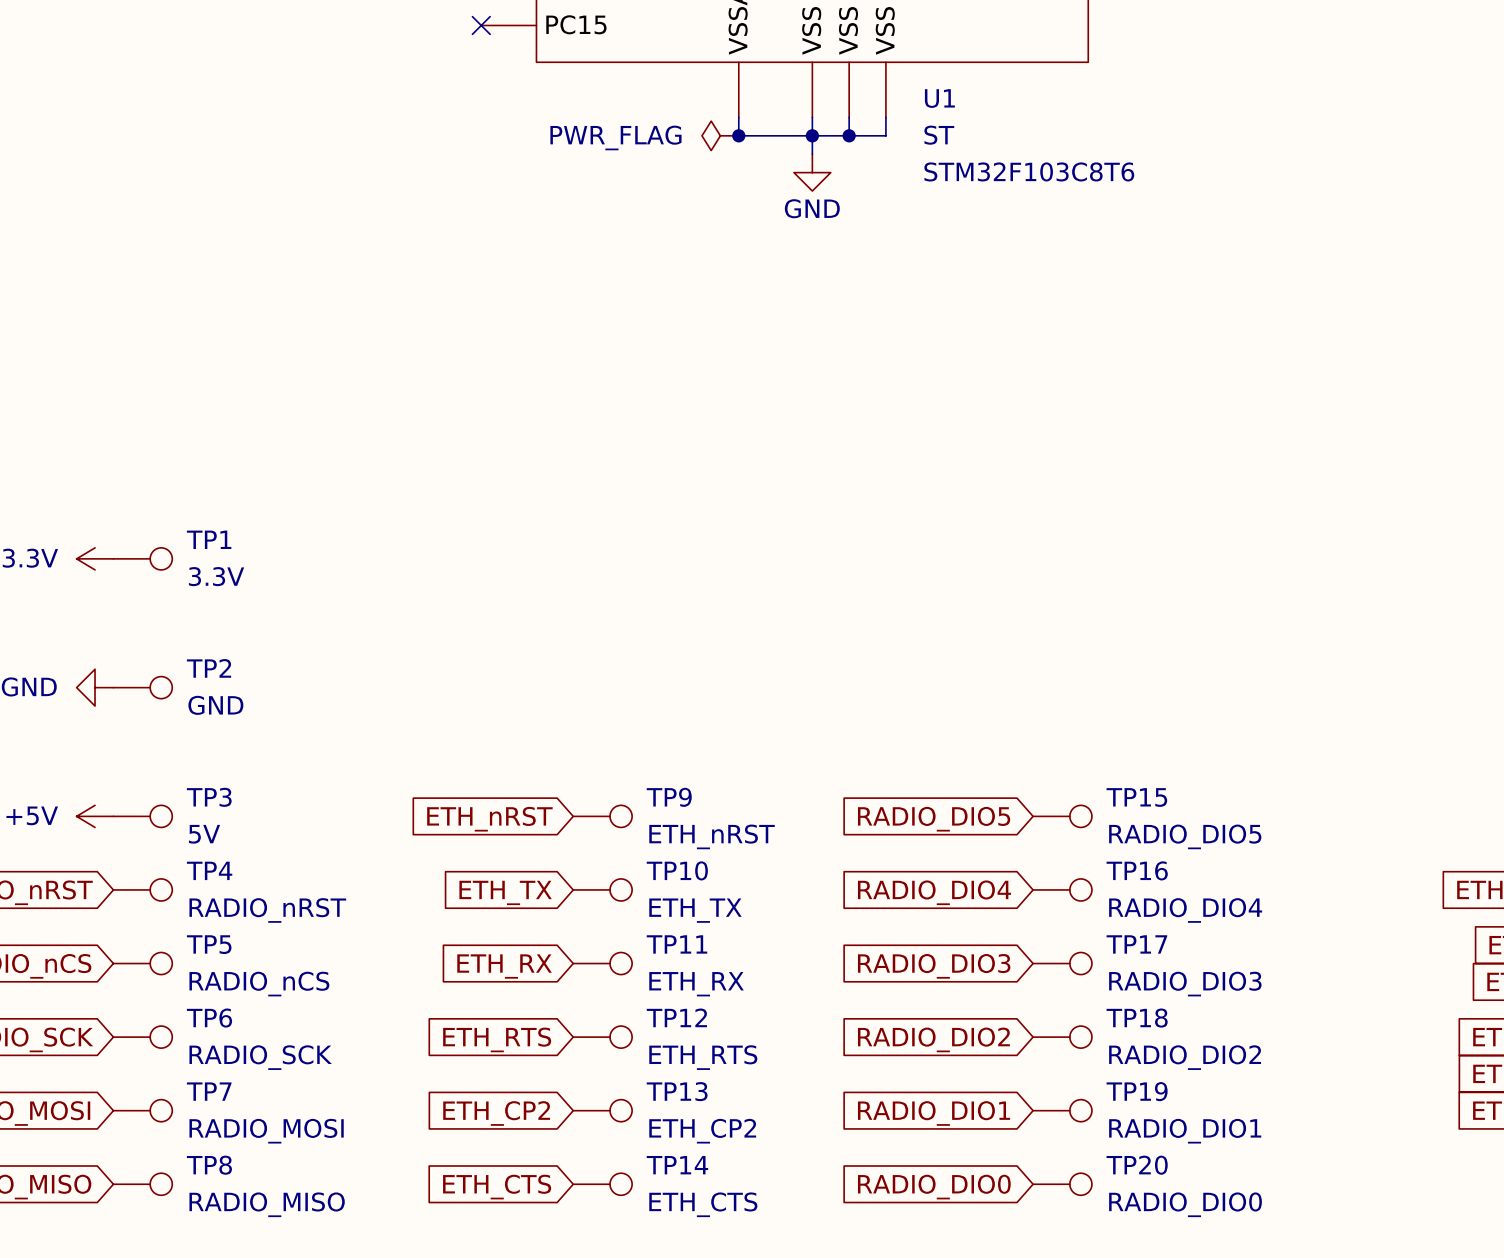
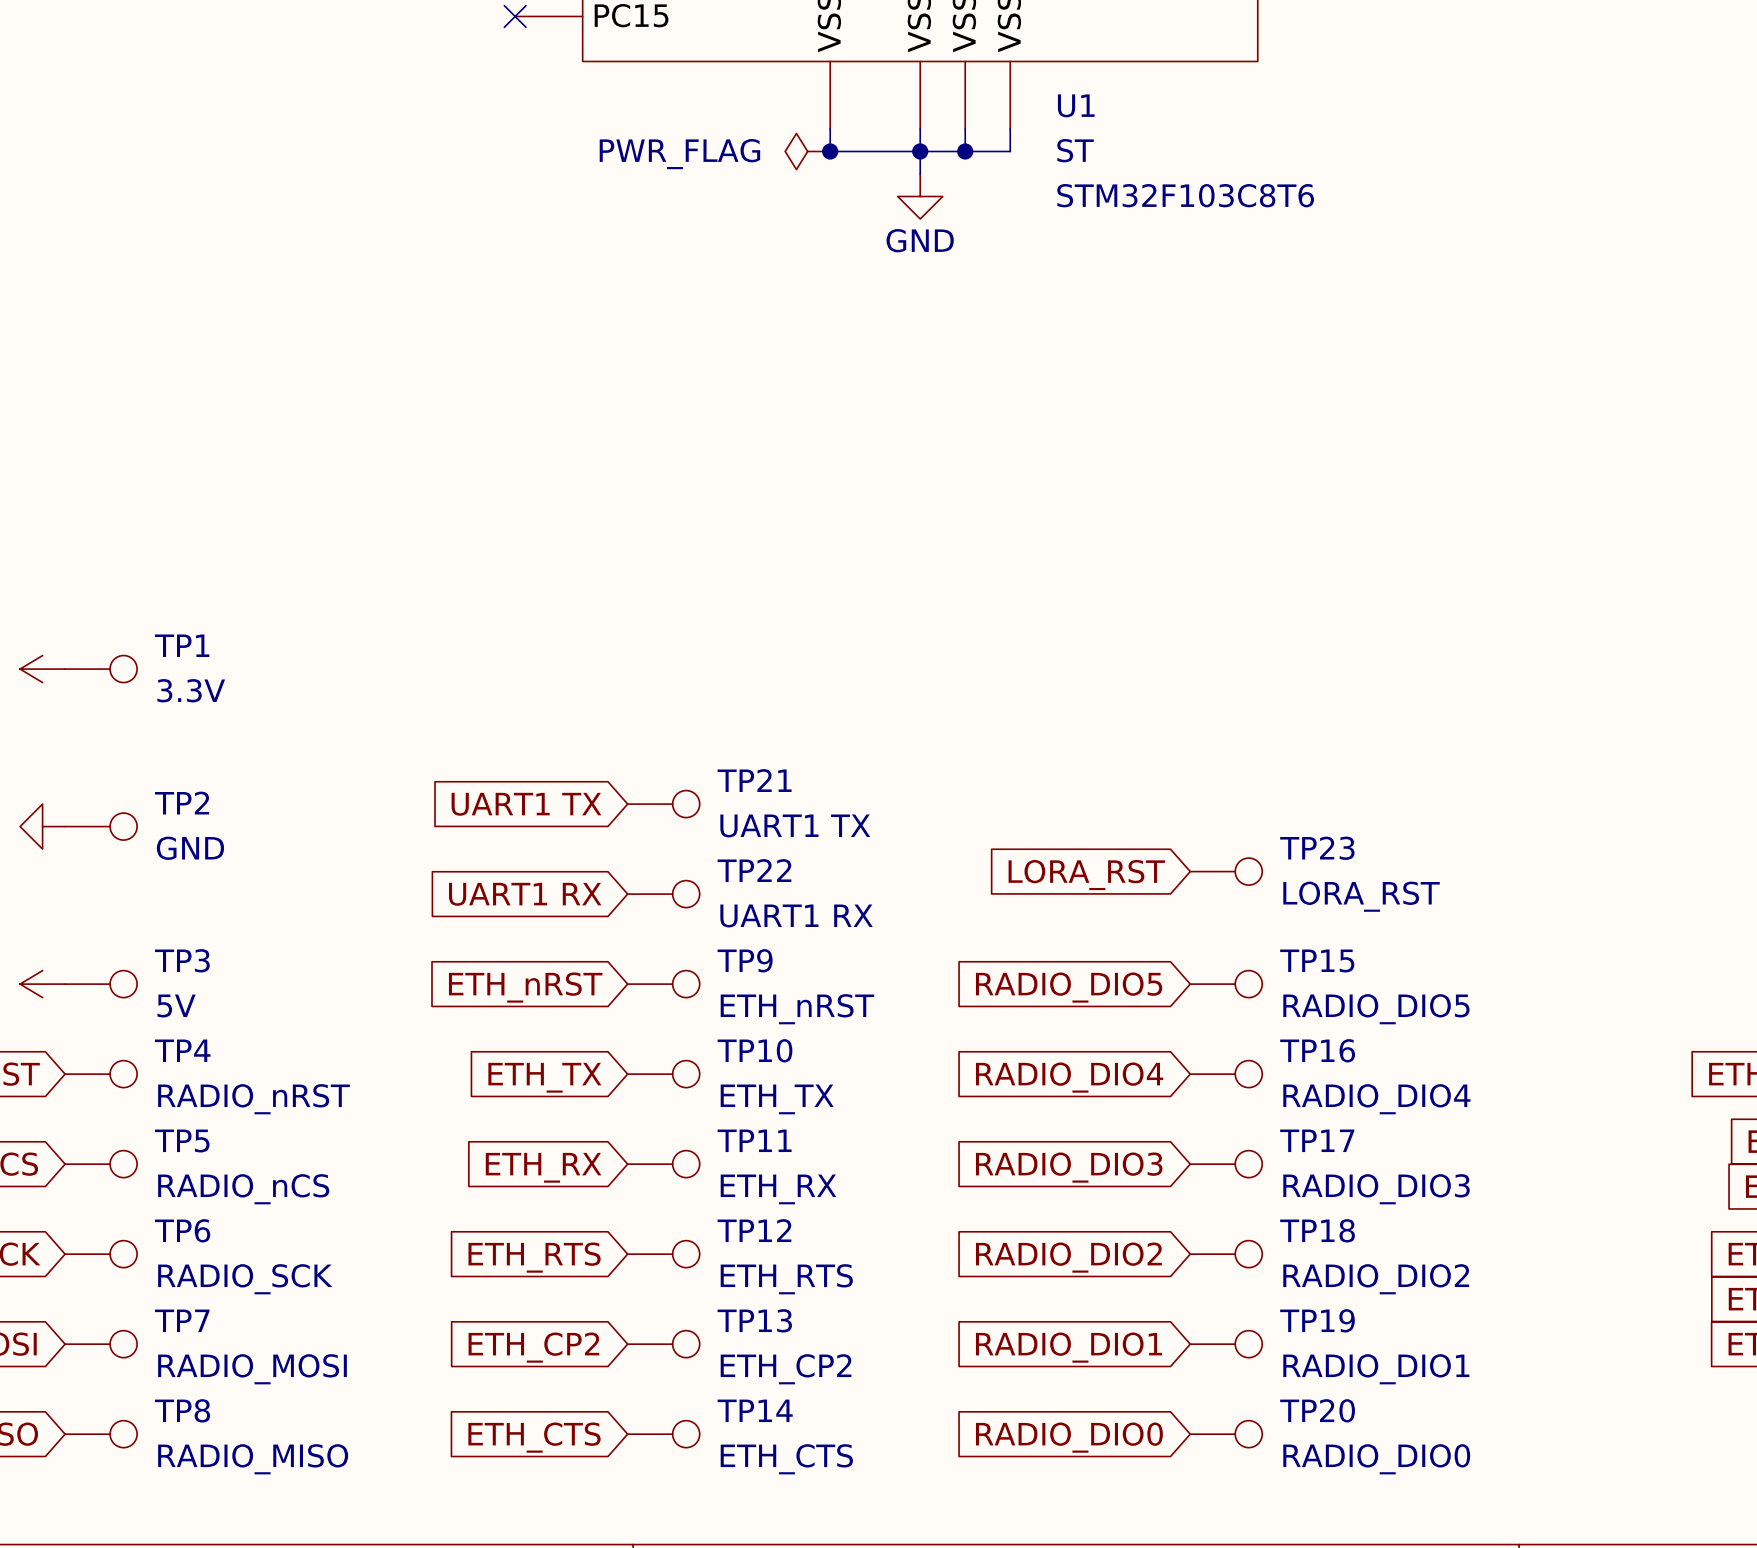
global label: none -> UART1 TX (526, 804)
TP21: none -> UART1 TX (663, 804)
TP23: none -> LORA_RST (1226, 871)
global label: none -> LORA_RST (1086, 875)
global label: none -> UART1 RX (525, 894)
TP22: none -> UART1 RX (663, 894)

